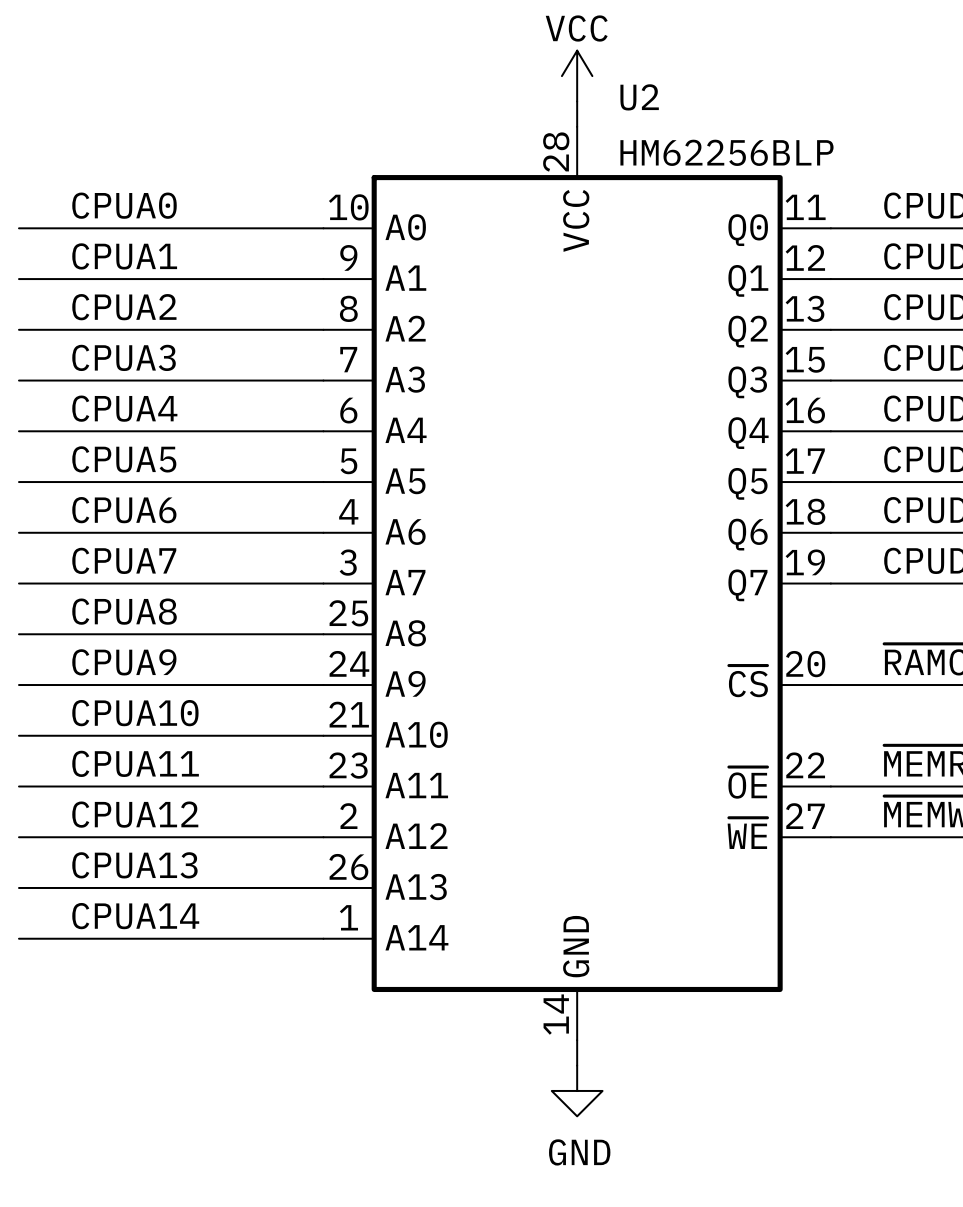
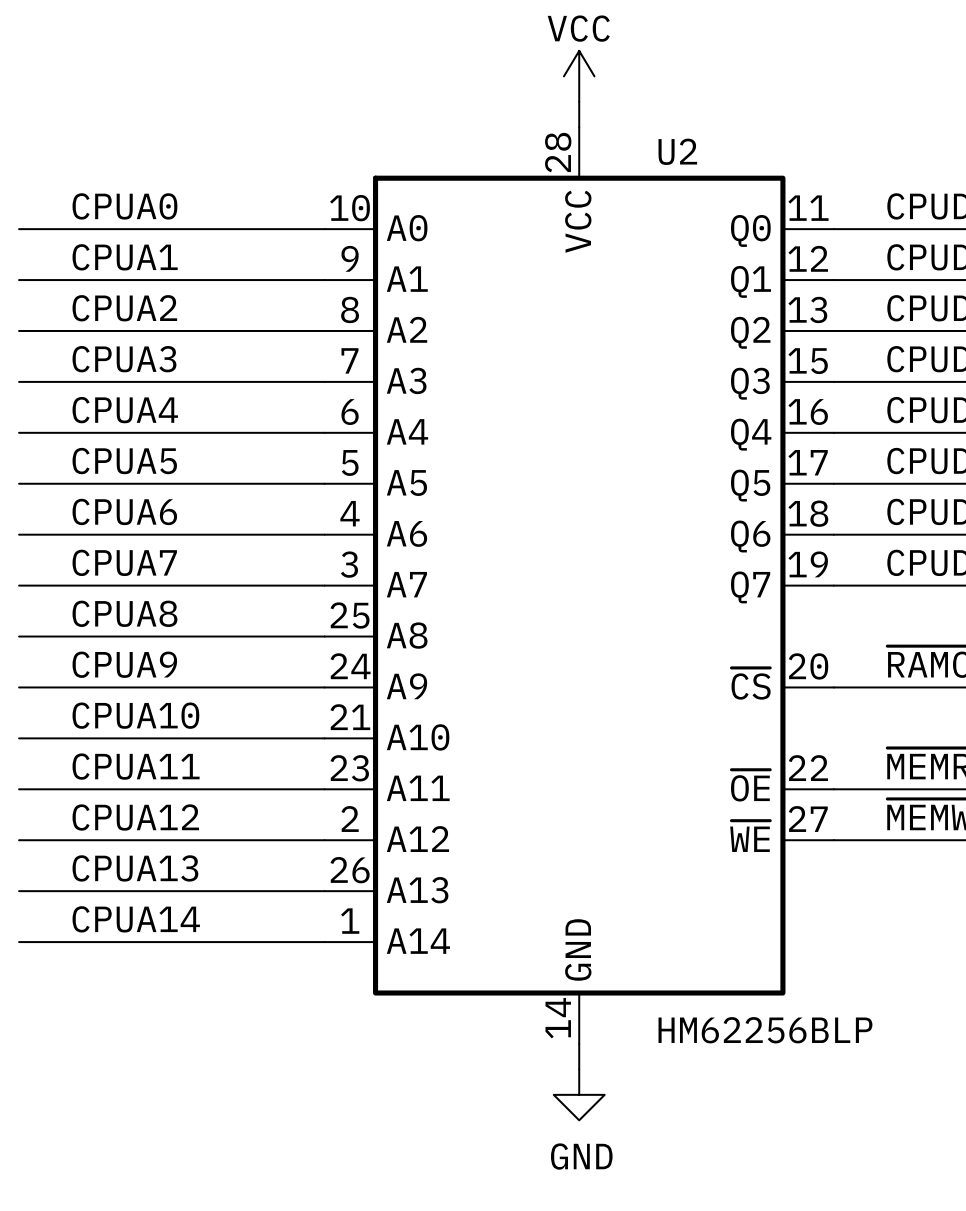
U2 name position: U2 (639, 97) -> U2 (677, 151)
U2 value position: HM62256BLP (726, 152) -> HM62256BLP (765, 1030)

